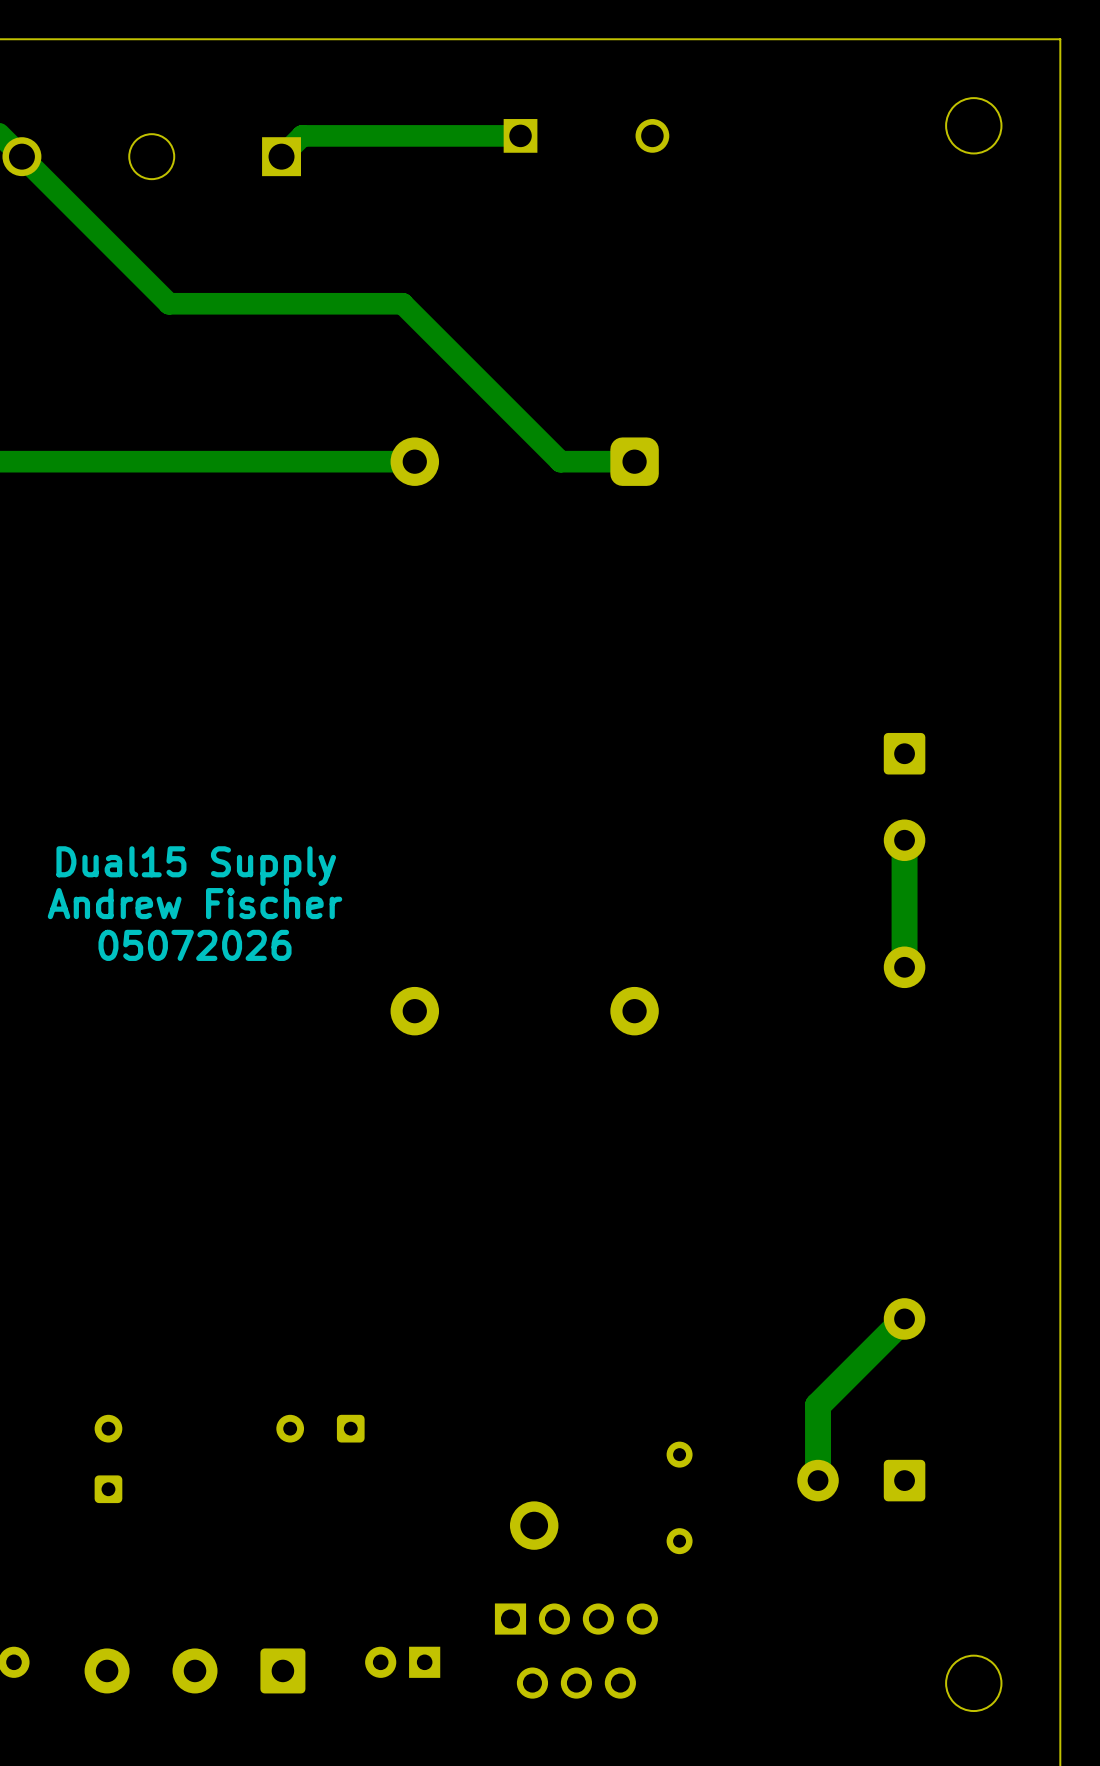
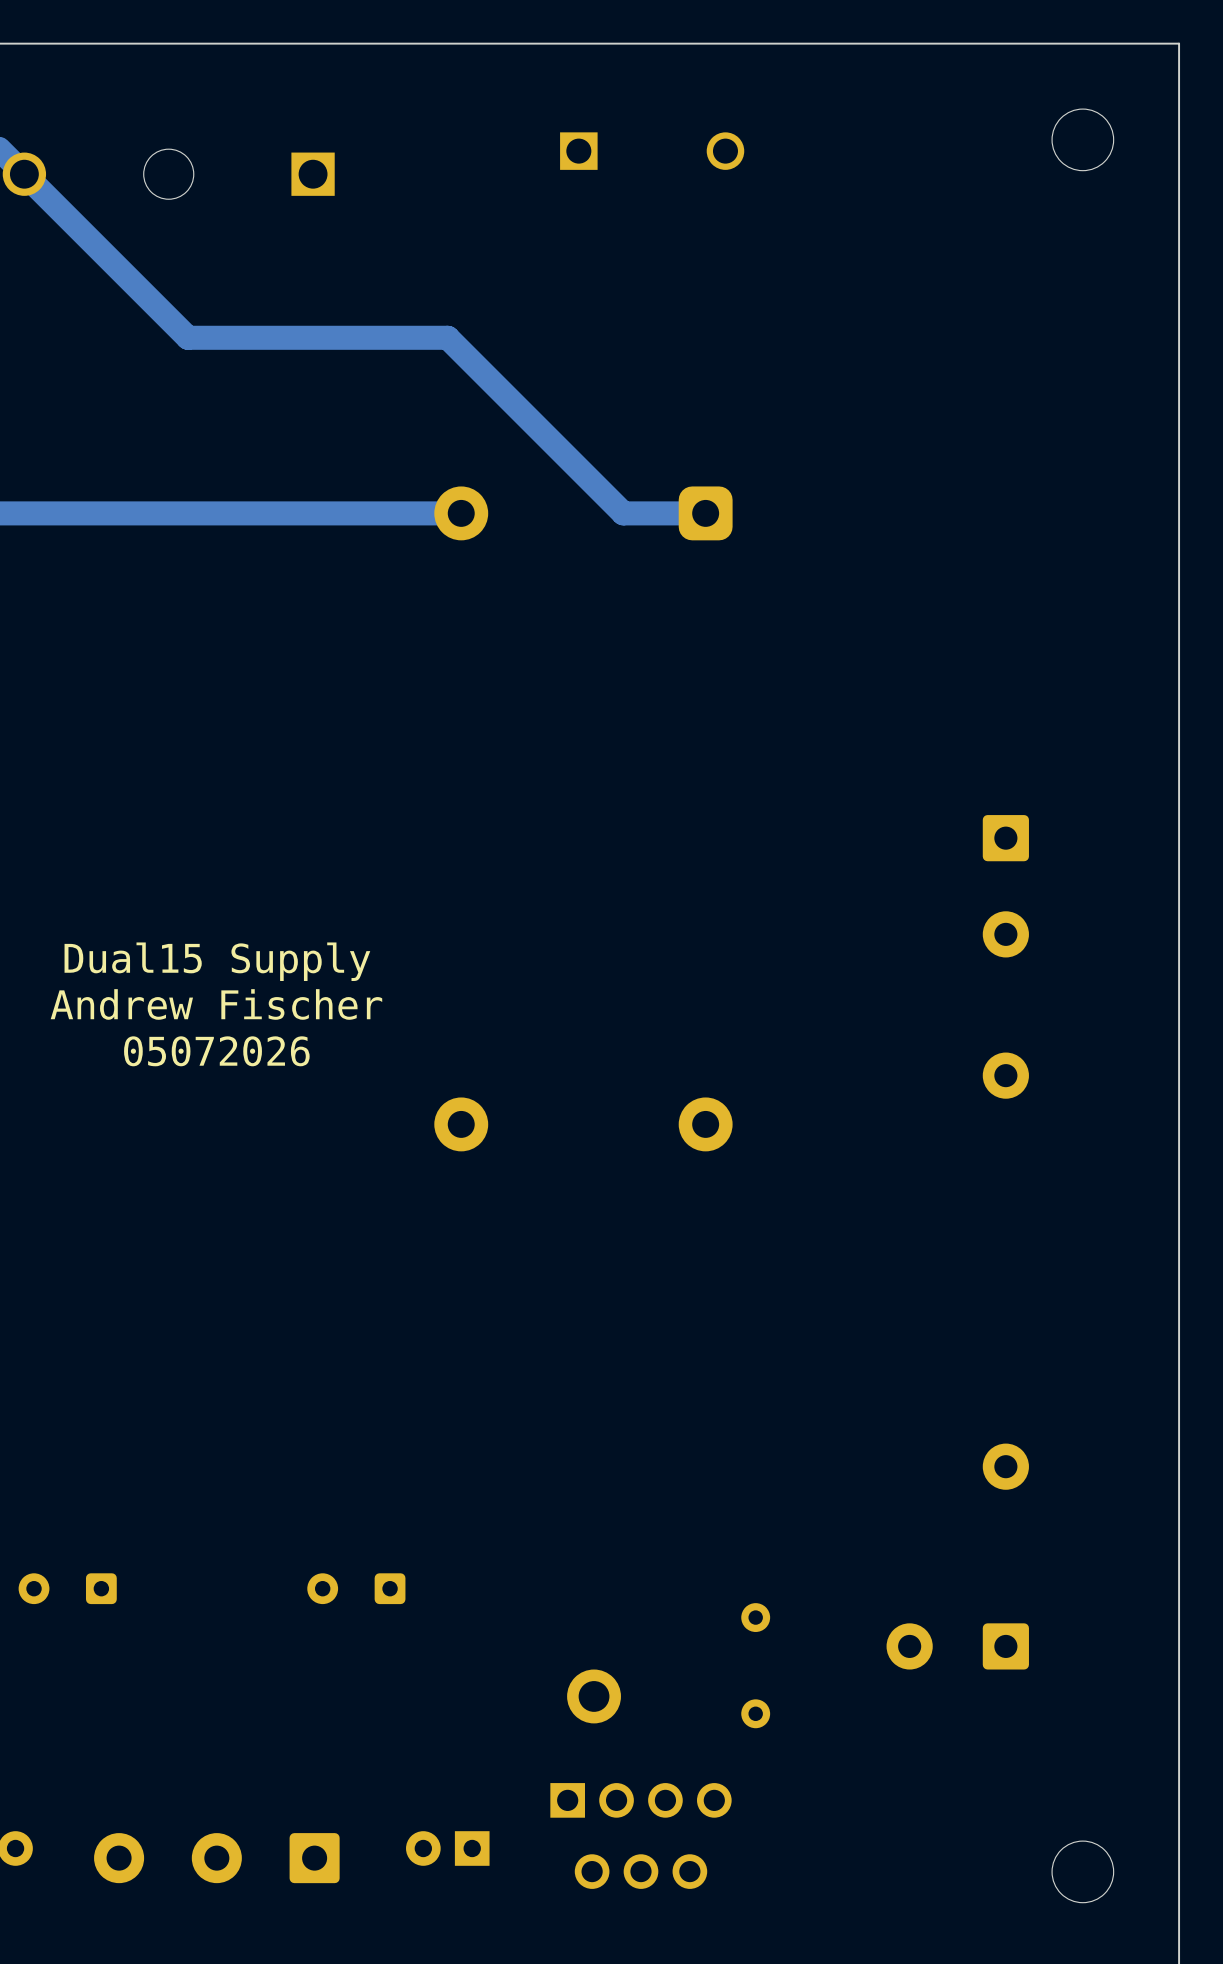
track: (520, 135) (302, 135) (281, 156) -> none
track: (904, 840) (904, 967) -> none
track: (904, 1318) (818, 1405) (818, 1480) -> none
part rotation: 0° (108, 1458) -> 90° counterclockwise (67, 1588)
part position: (108, 1458) -> (67, 1588)

